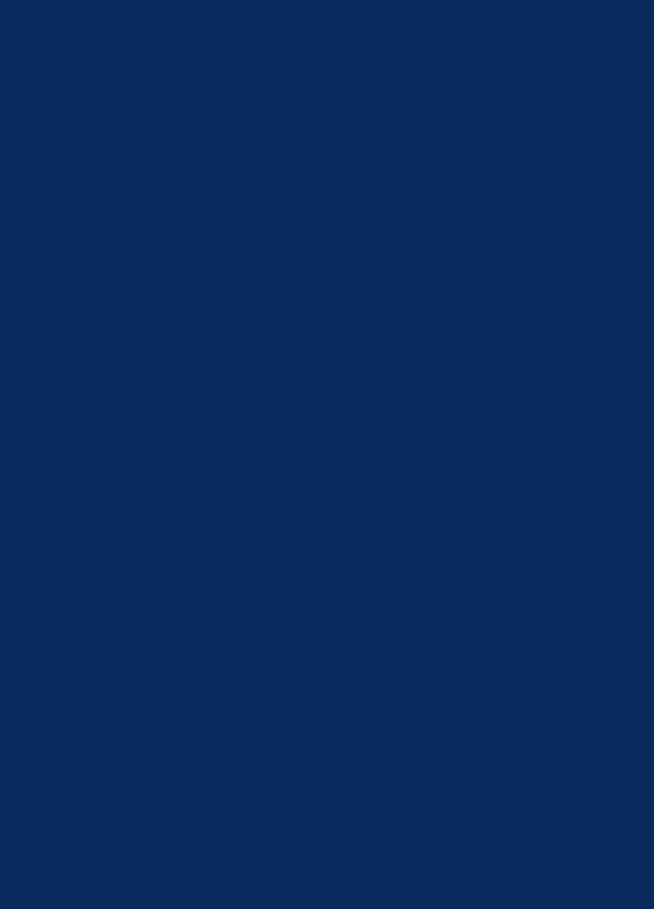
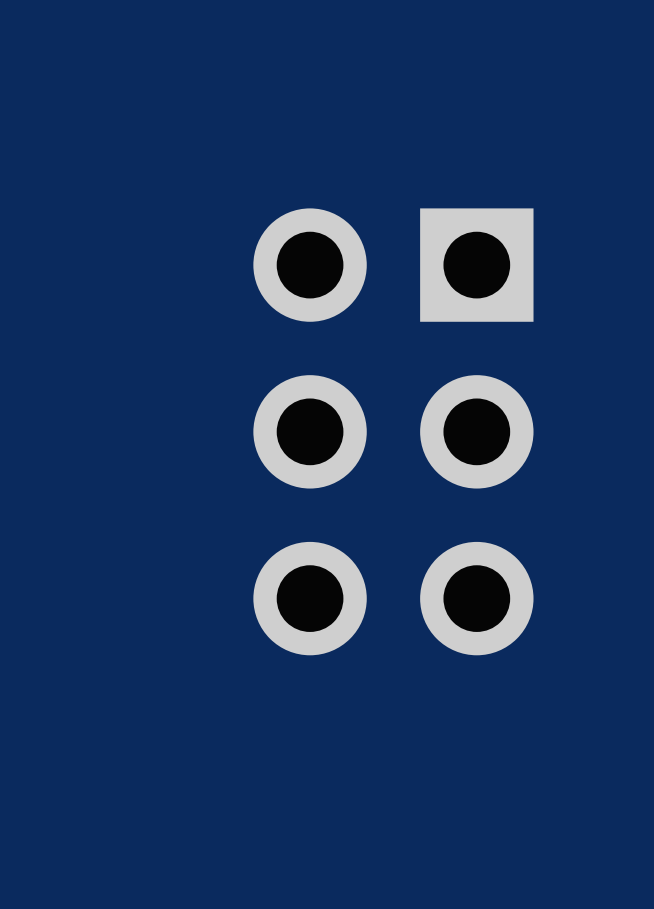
part: none -> (393, 431)

